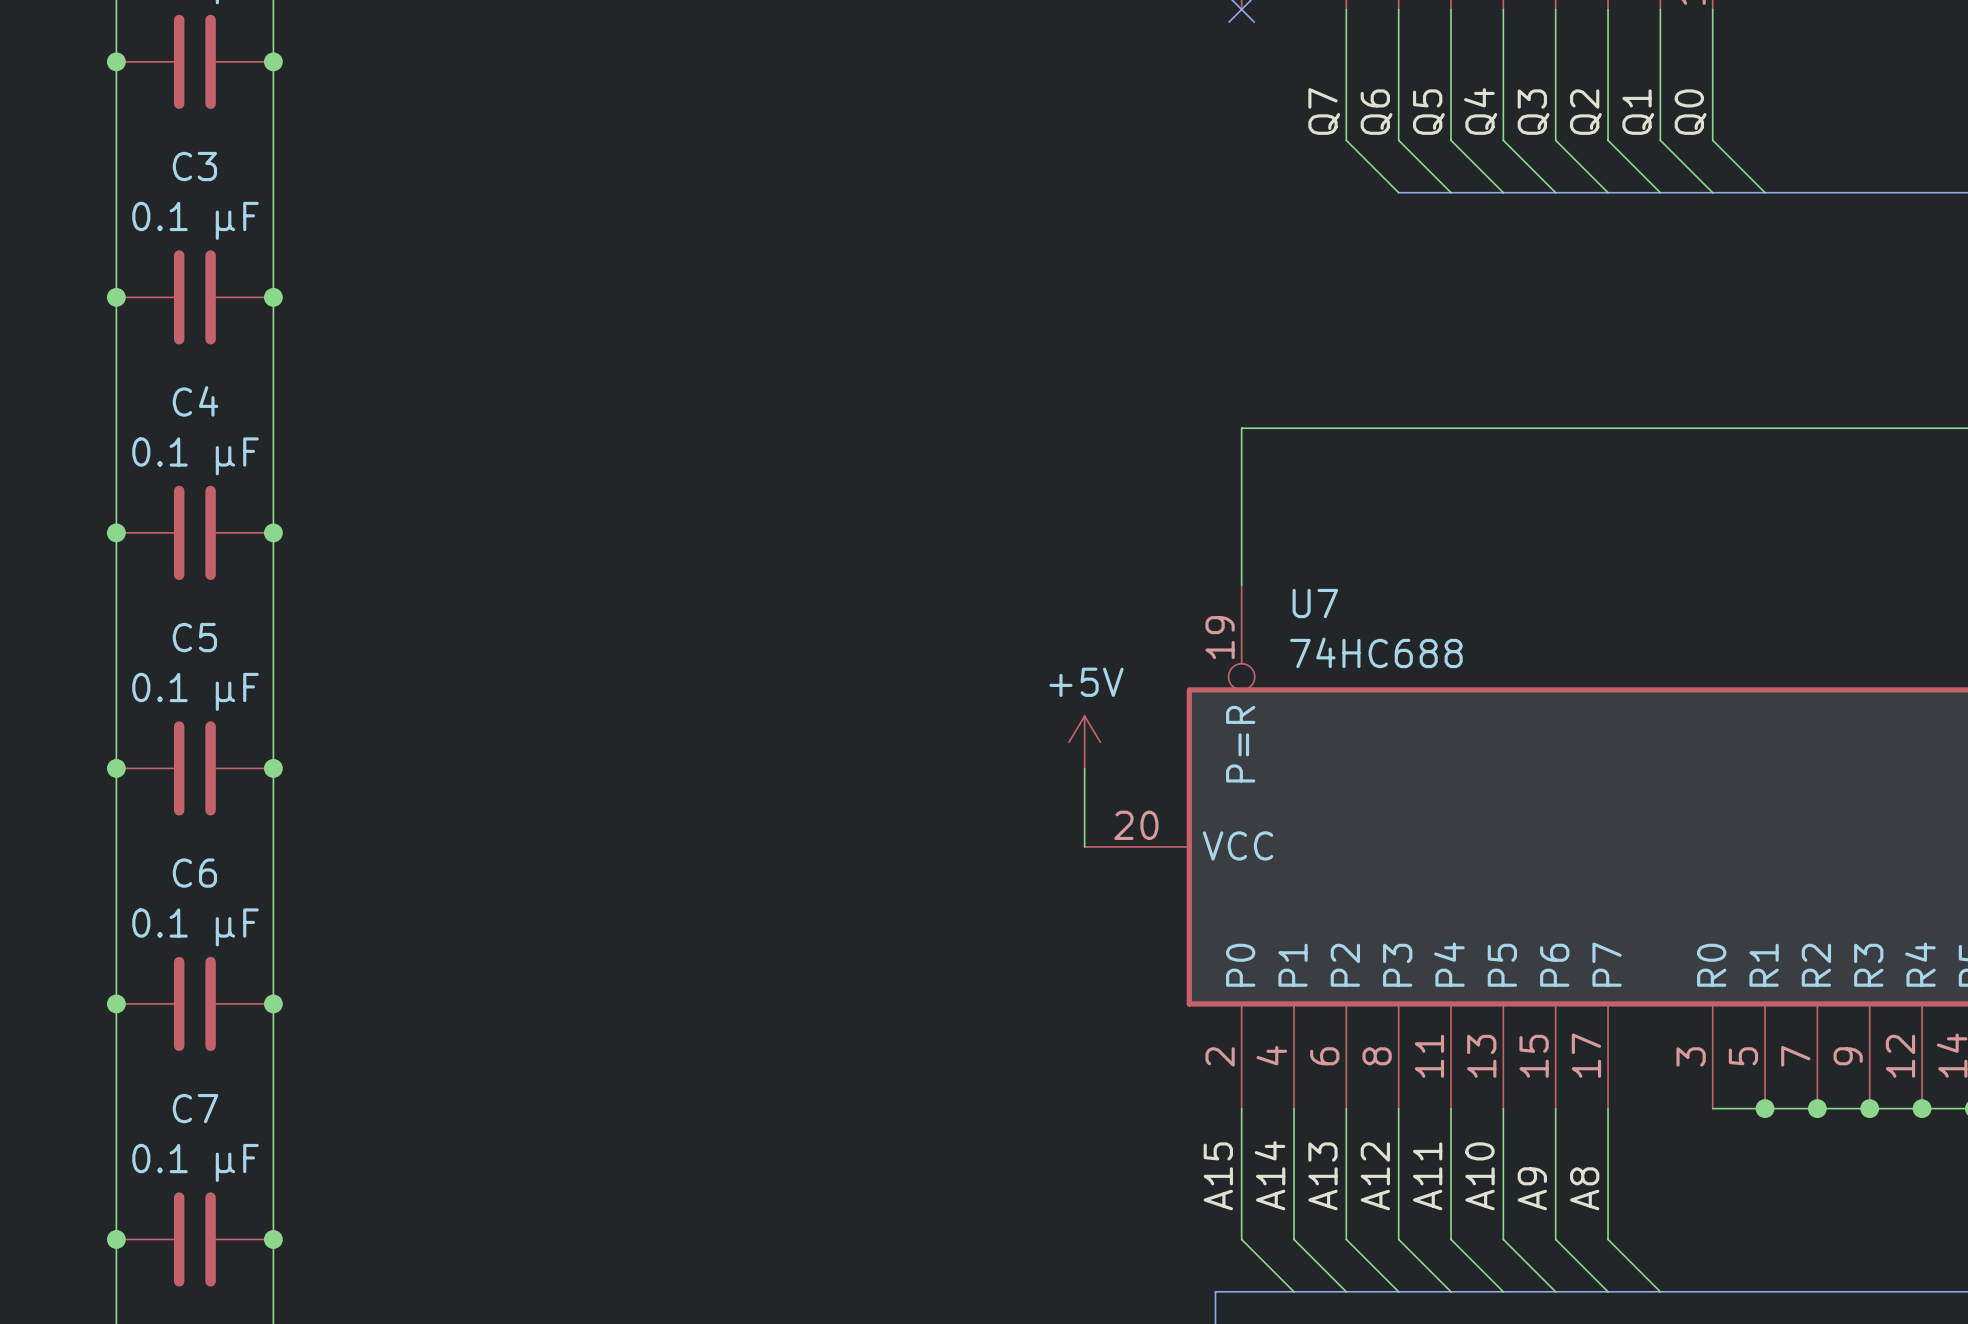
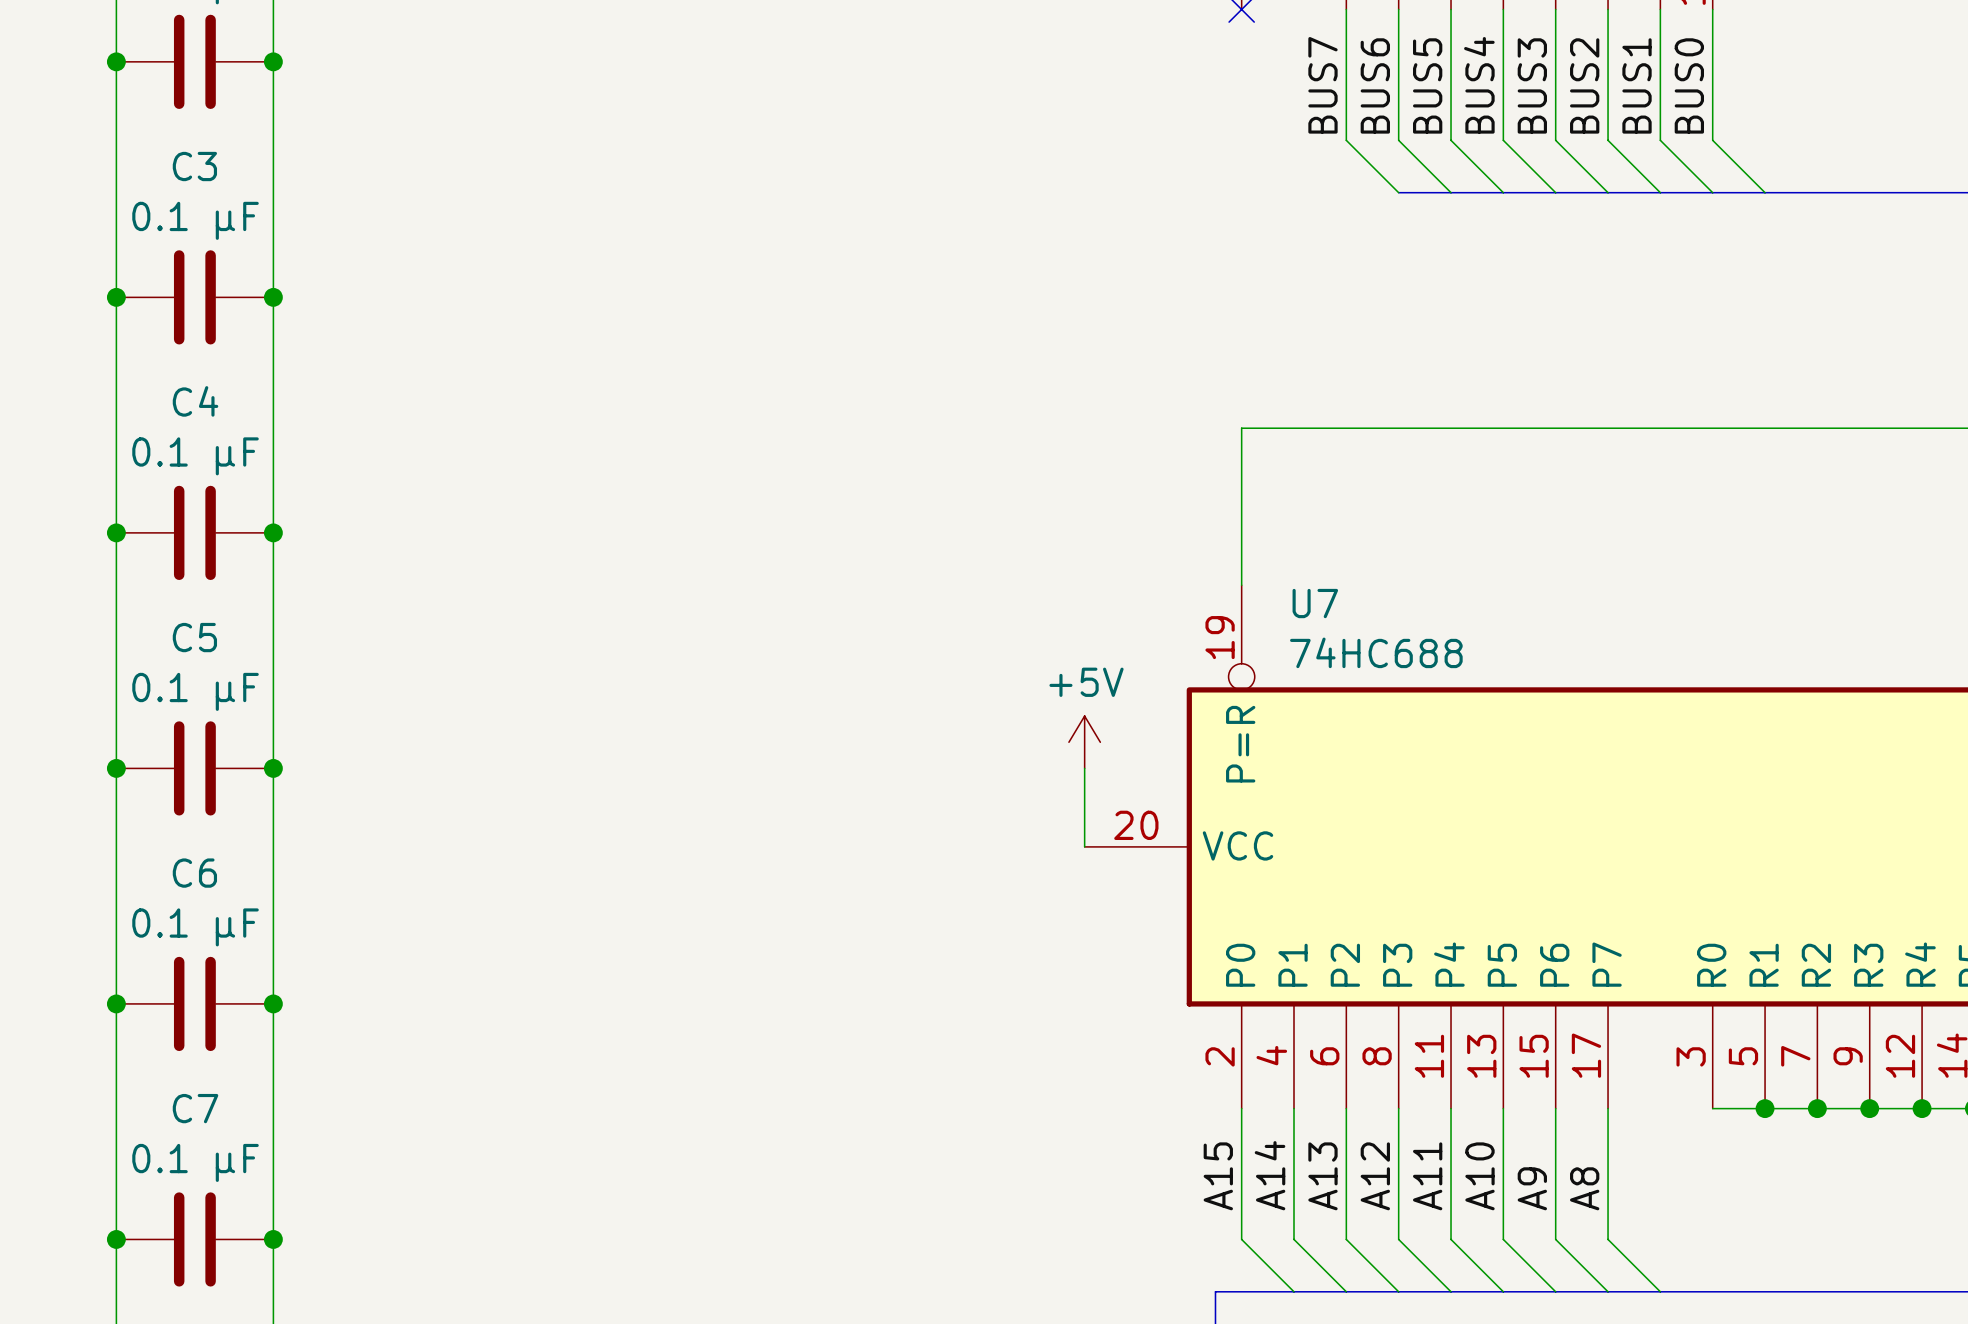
label: Q7 (1324, 111) -> BUS7 (1322, 85)
label: Q4 (1480, 111) -> BUS4 (1479, 85)
label: Q6 (1376, 112) -> BUS6 (1375, 85)
label: Q5 (1428, 112) -> BUS5 (1427, 85)
label: Q3 (1533, 112) -> BUS3 (1532, 85)
label: Q2 (1585, 112) -> BUS2 (1584, 85)
label: Q1 (1638, 112) -> BUS1 (1637, 85)
label: Q0 (1690, 112) -> BUS0 (1689, 85)

